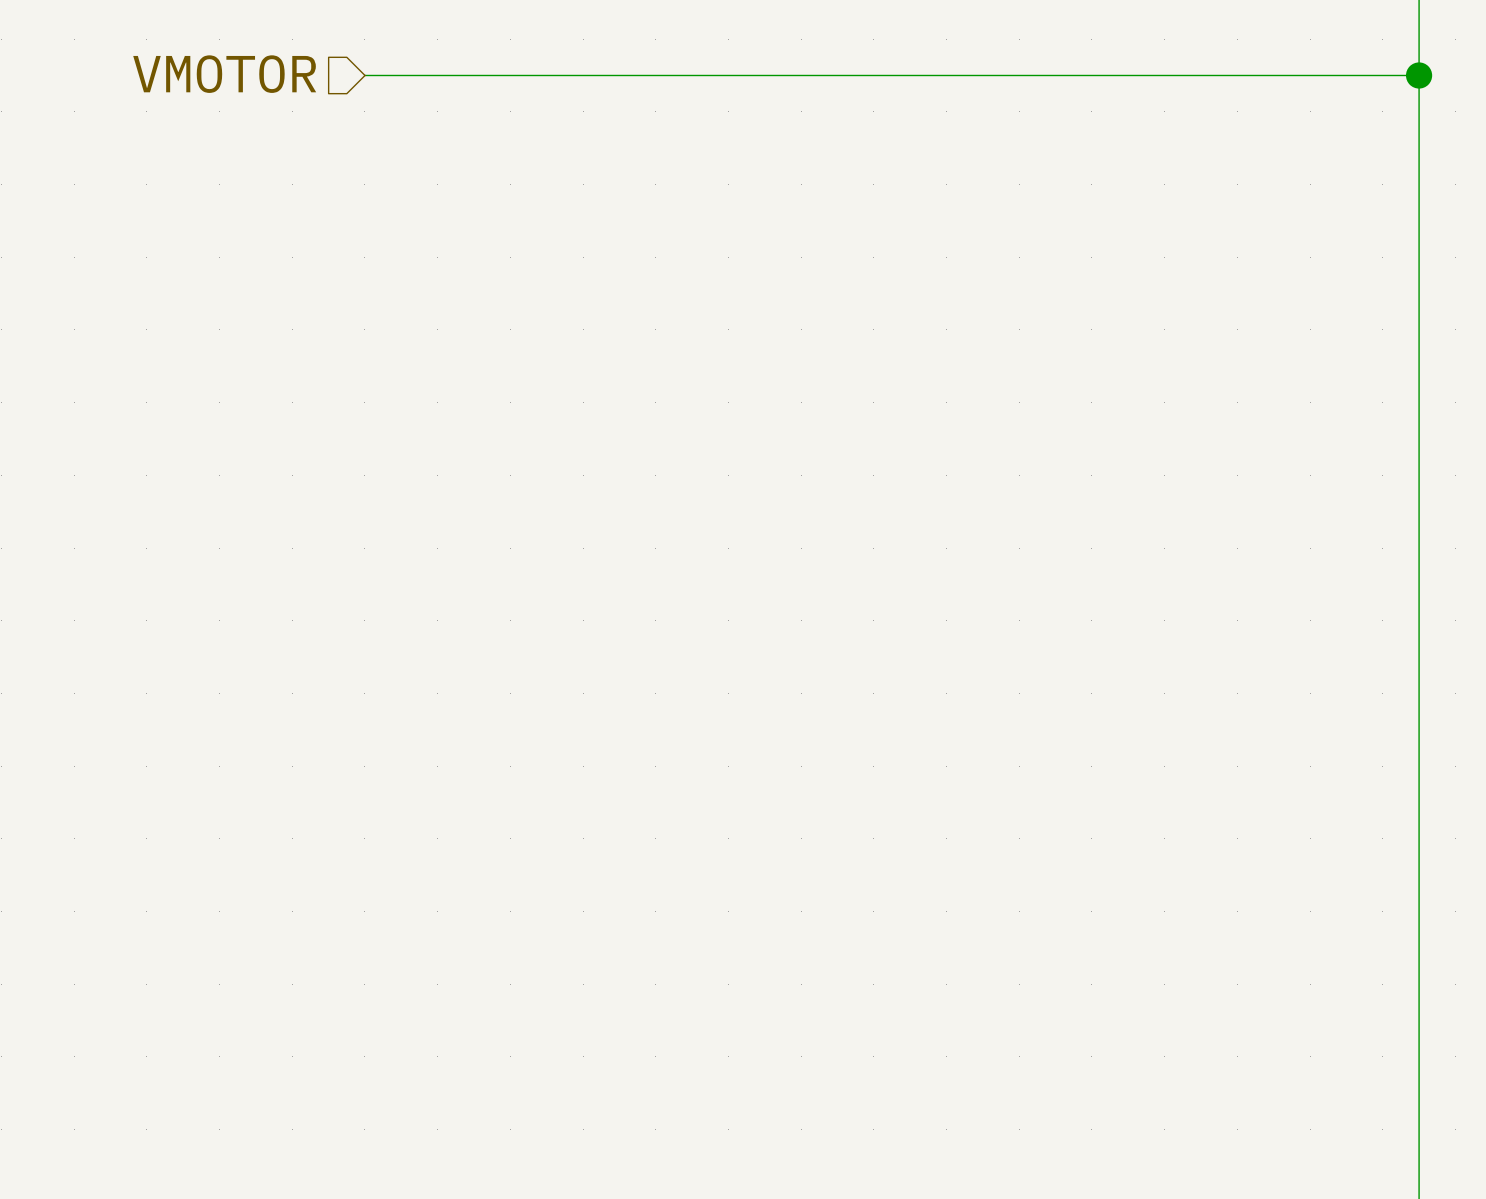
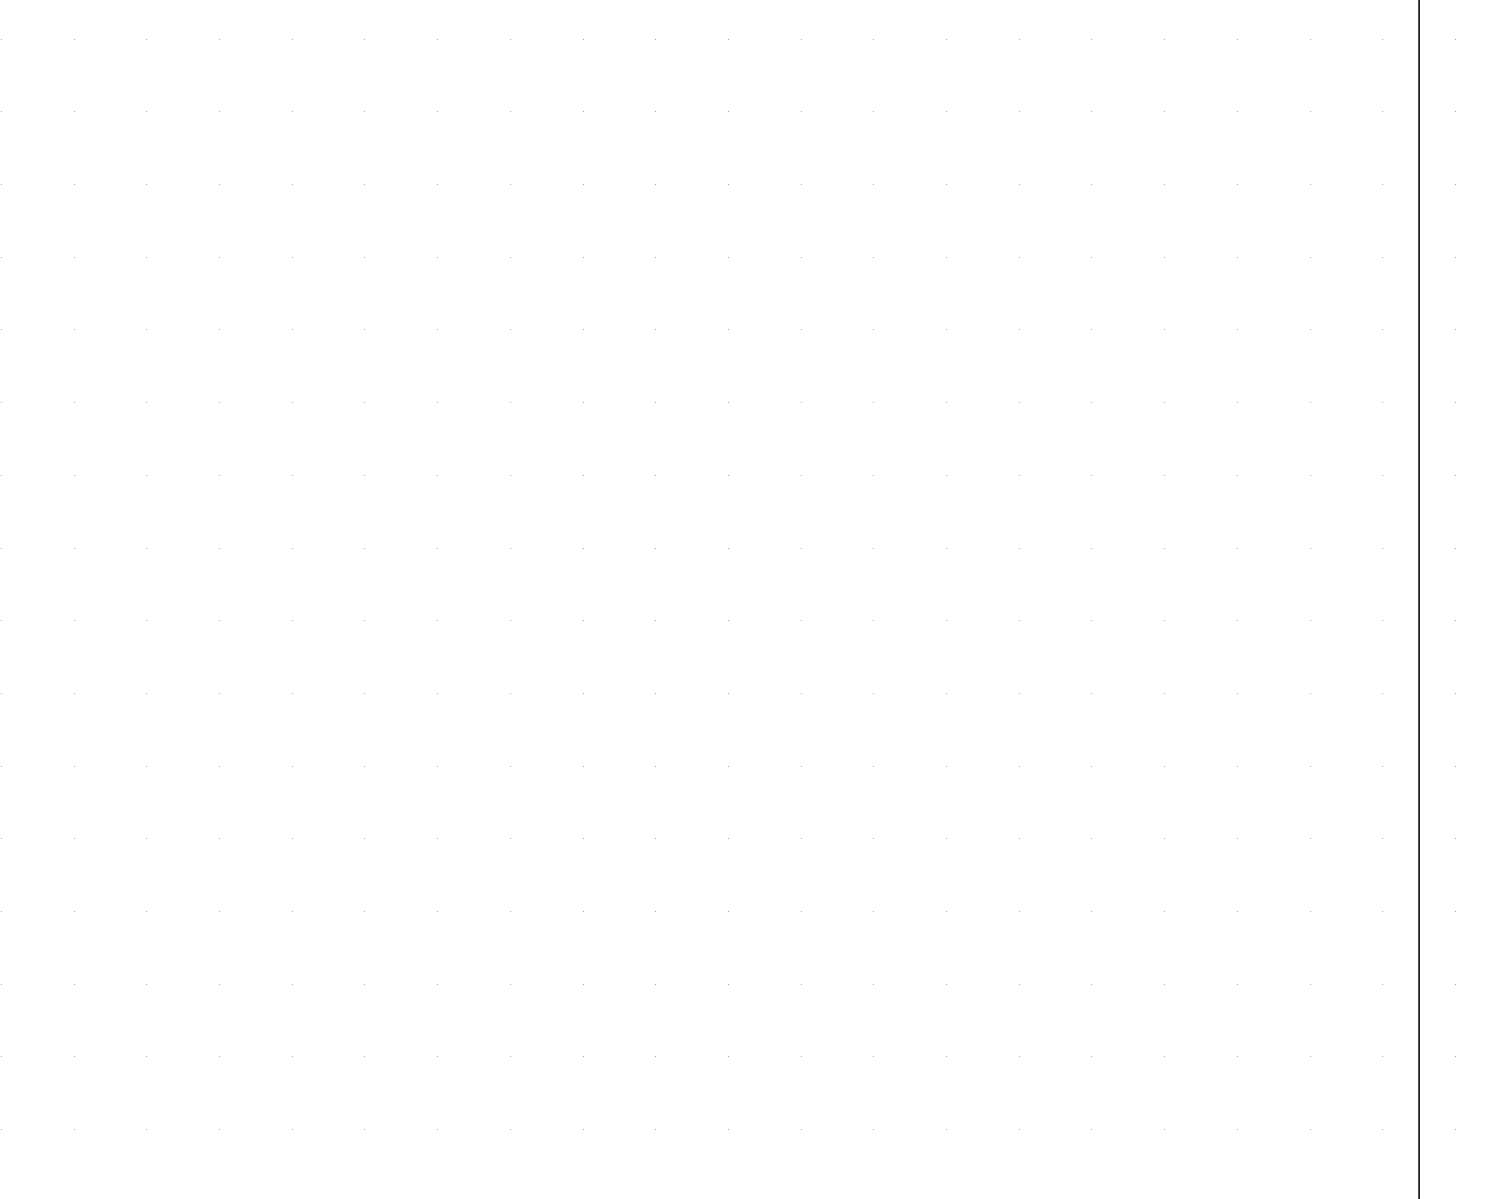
hierarchical label: VMOTOR (224, 74) -> none
wire: (364, 75) (1419, 75) -> none
junction: (1419, 75) -> none

